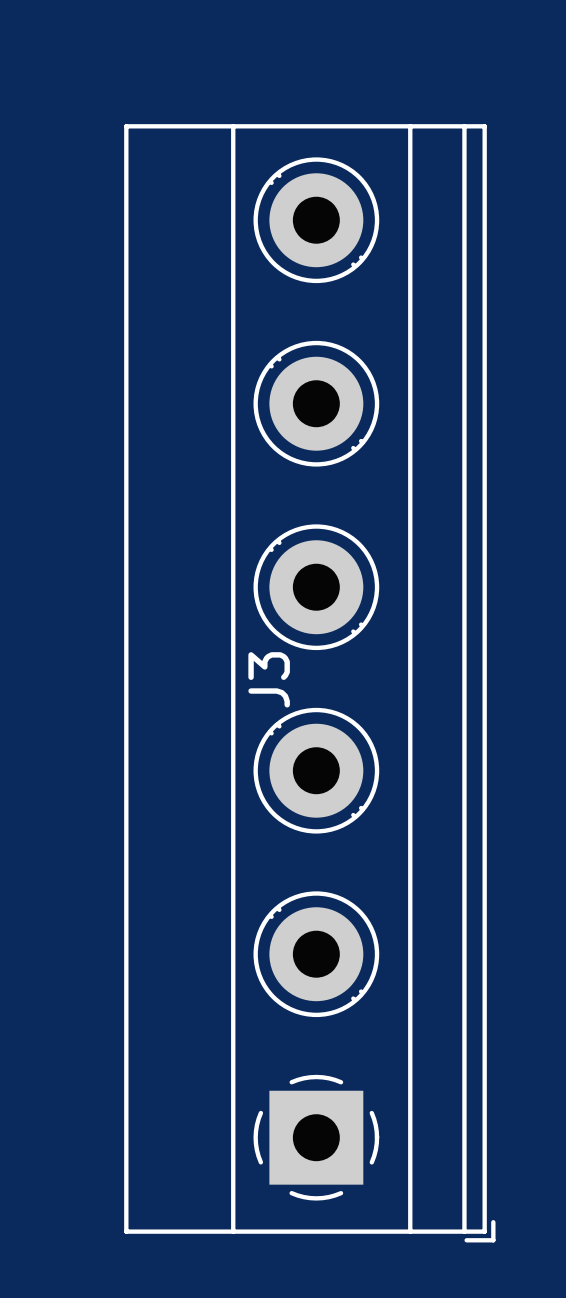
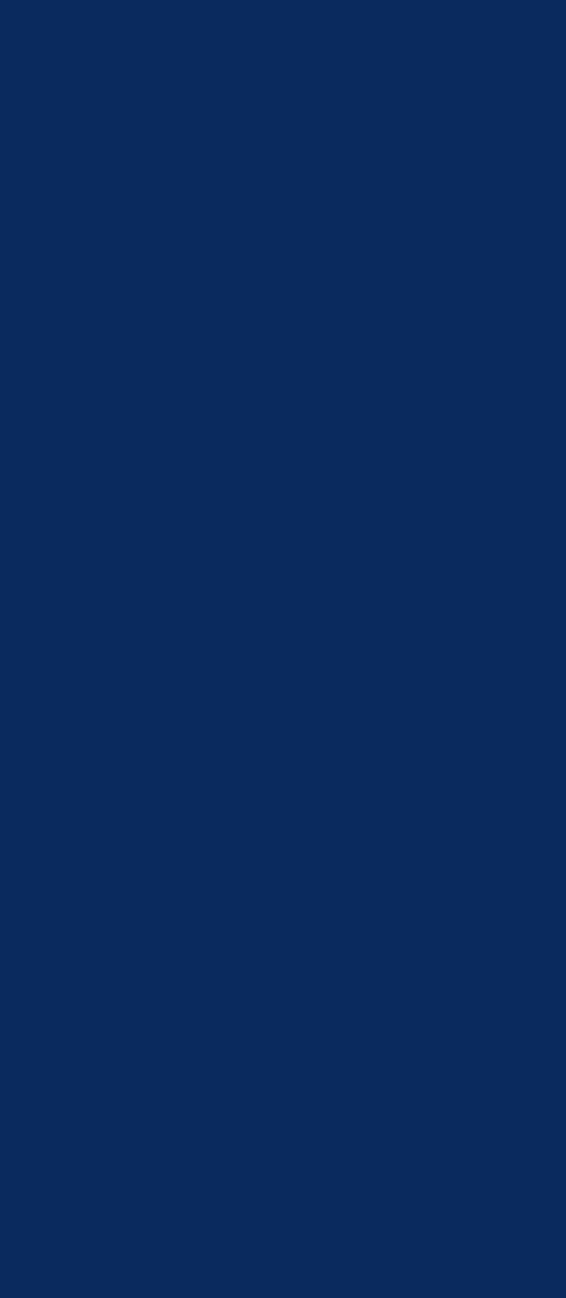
J3: (309, 683) -> none

